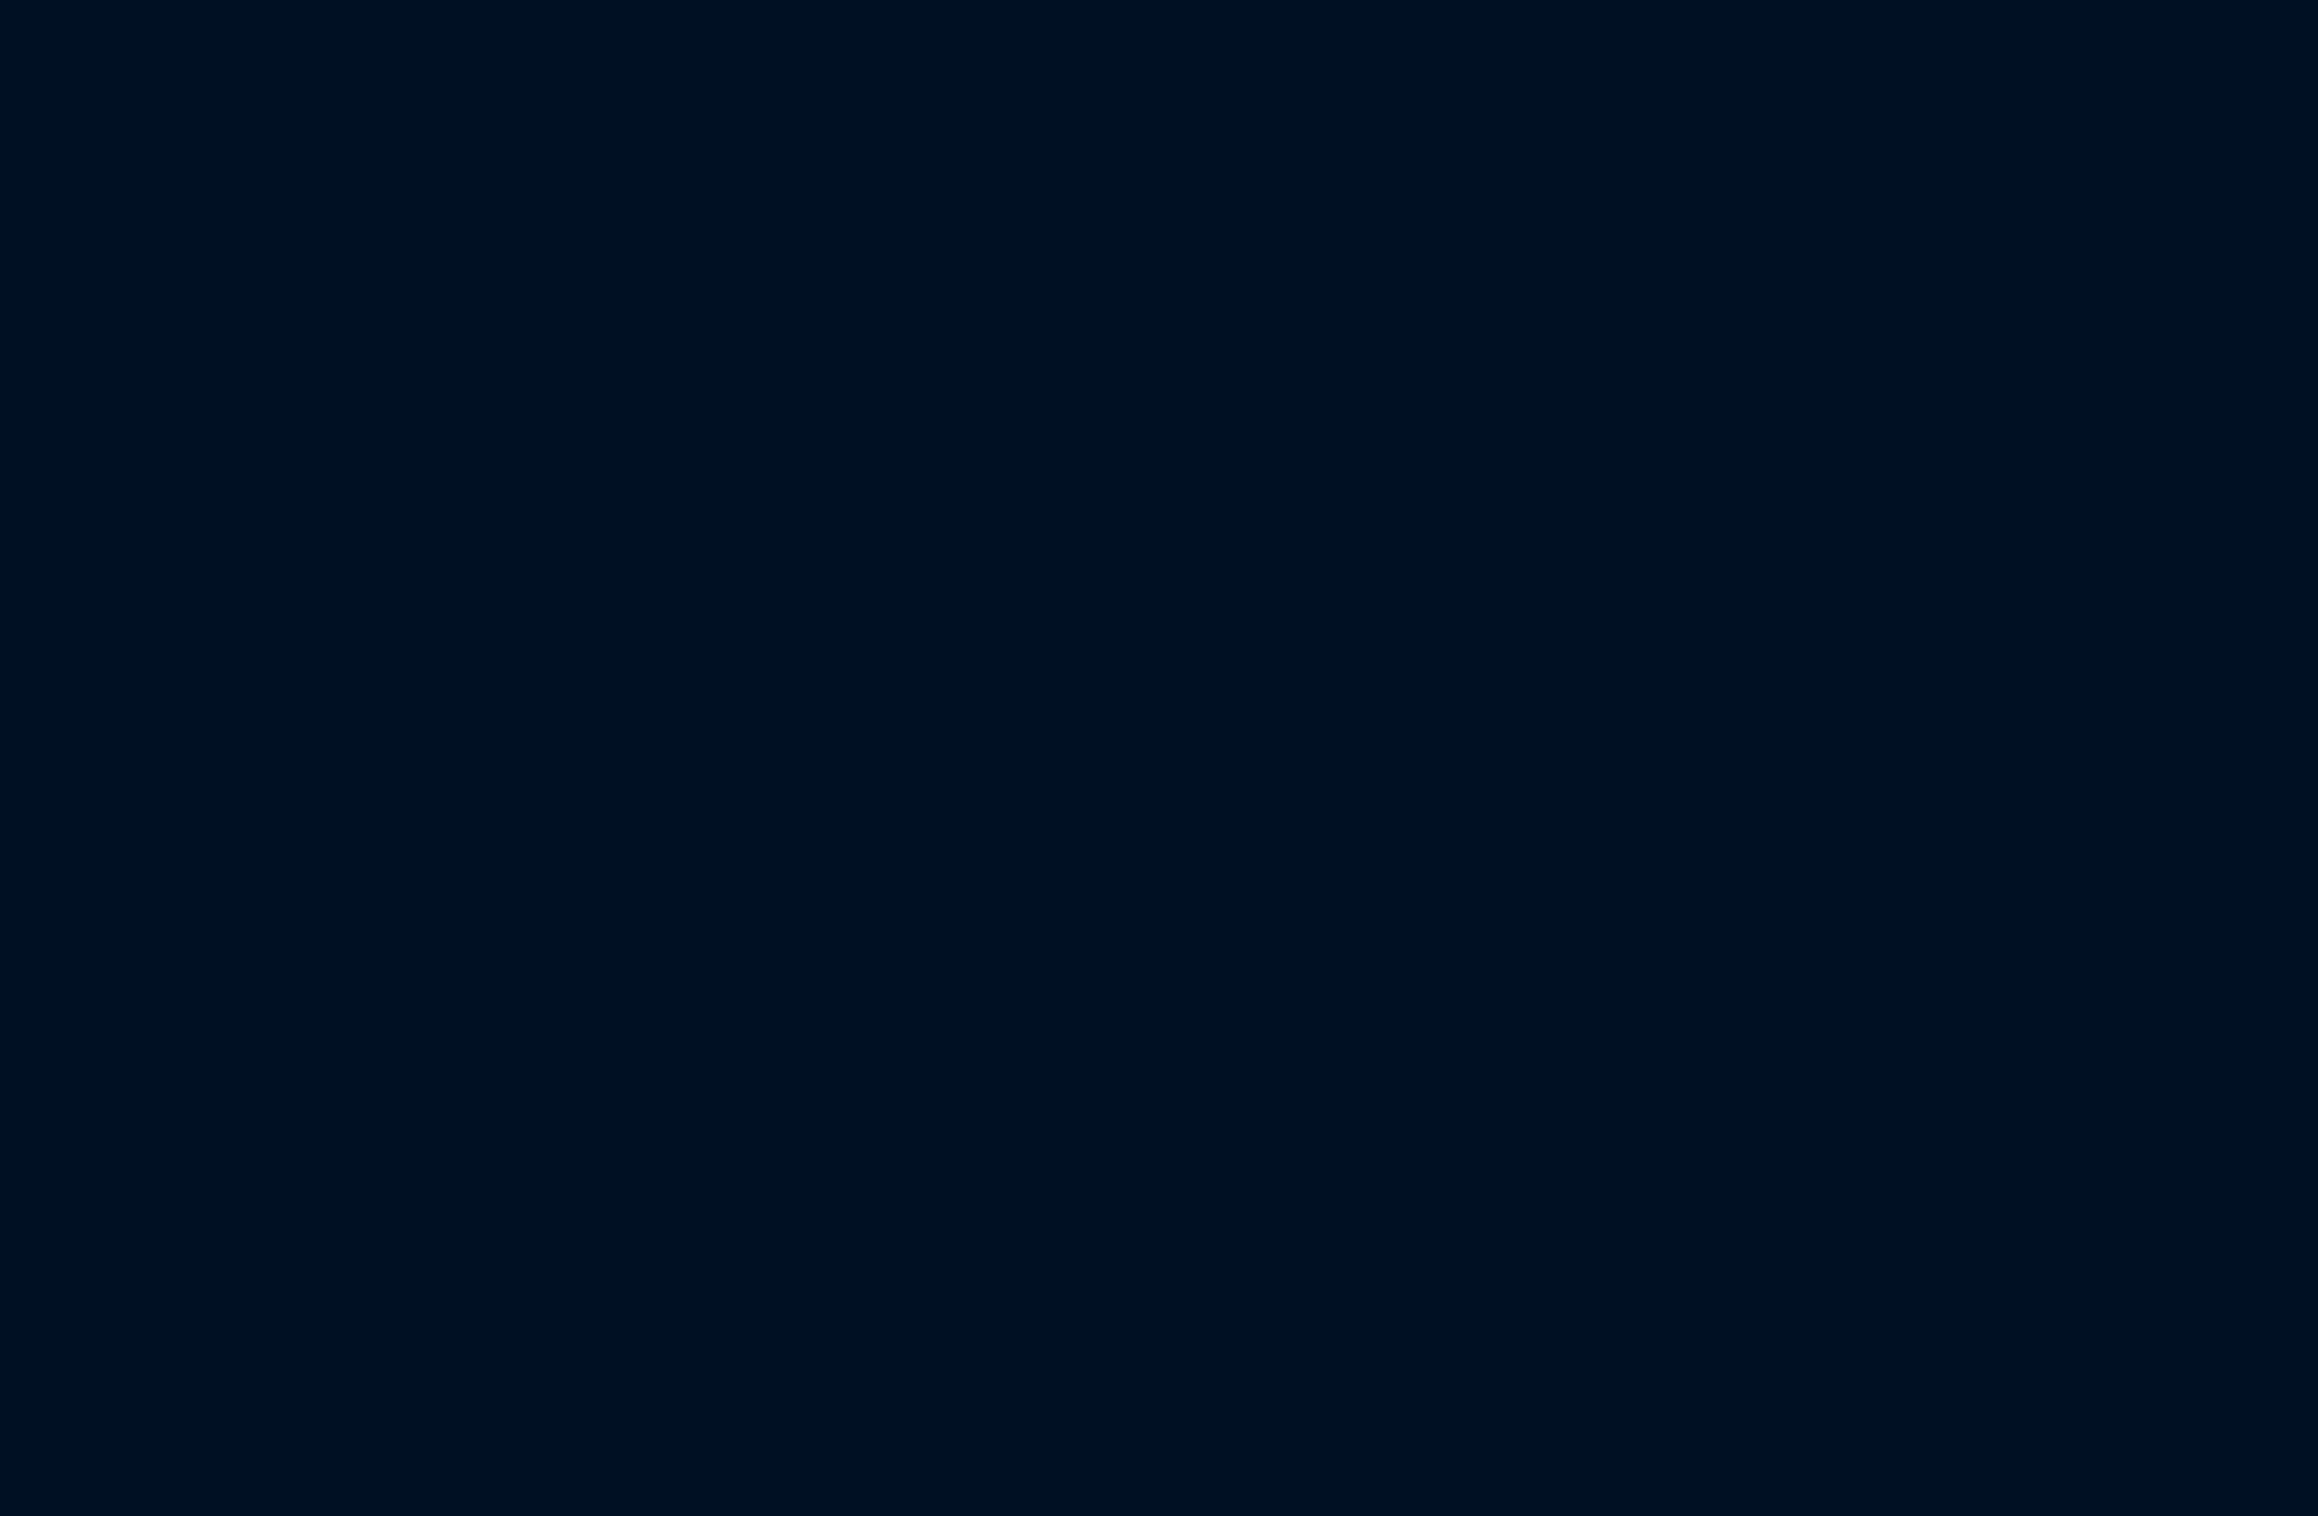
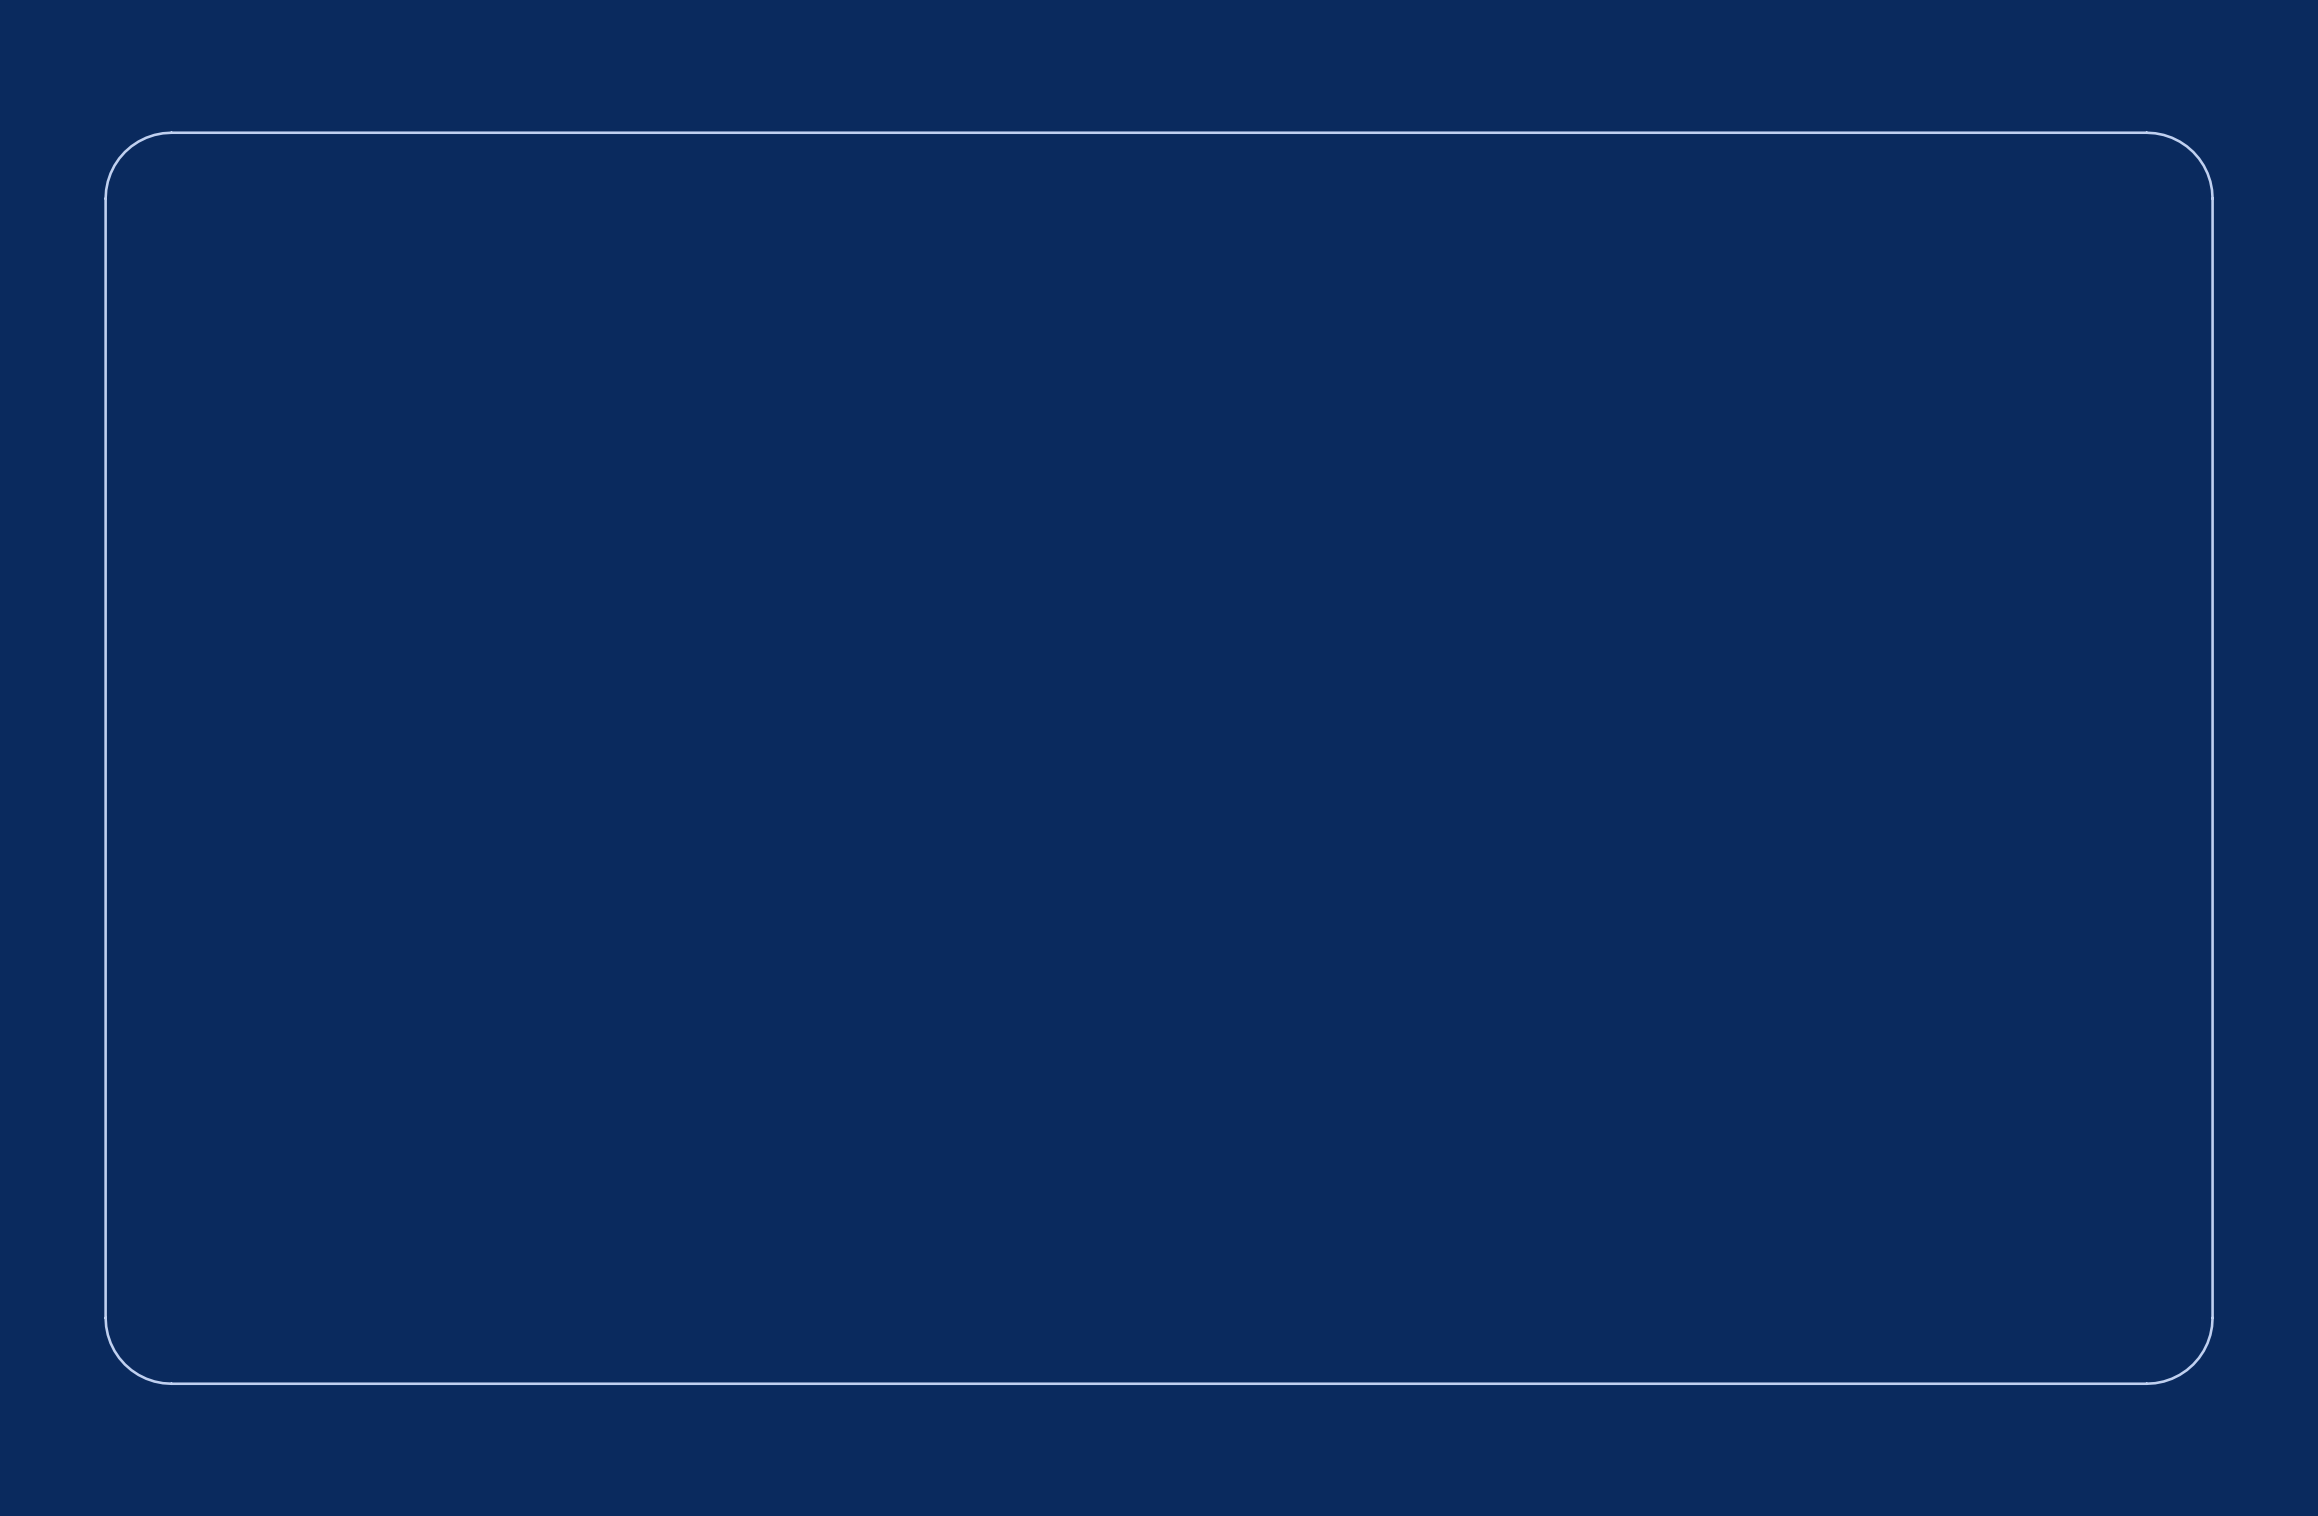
board edge: none -> (2146, 132) (171, 132) (154, 134) (138, 141) (124, 152) (114, 165) (107, 181) (105, 198) (105, 1317) (107, 1334) (114, 1350) (124, 1364) (138, 1374) (154, 1381) (171, 1383) (2146, 1383) (2163, 1381) (2179, 1374) (2193, 1364) (2203, 1350) (2210, 1334) (2212, 1317) (2212, 198) (2207, 173) (2193, 152) (2171, 137) (2146, 132)

